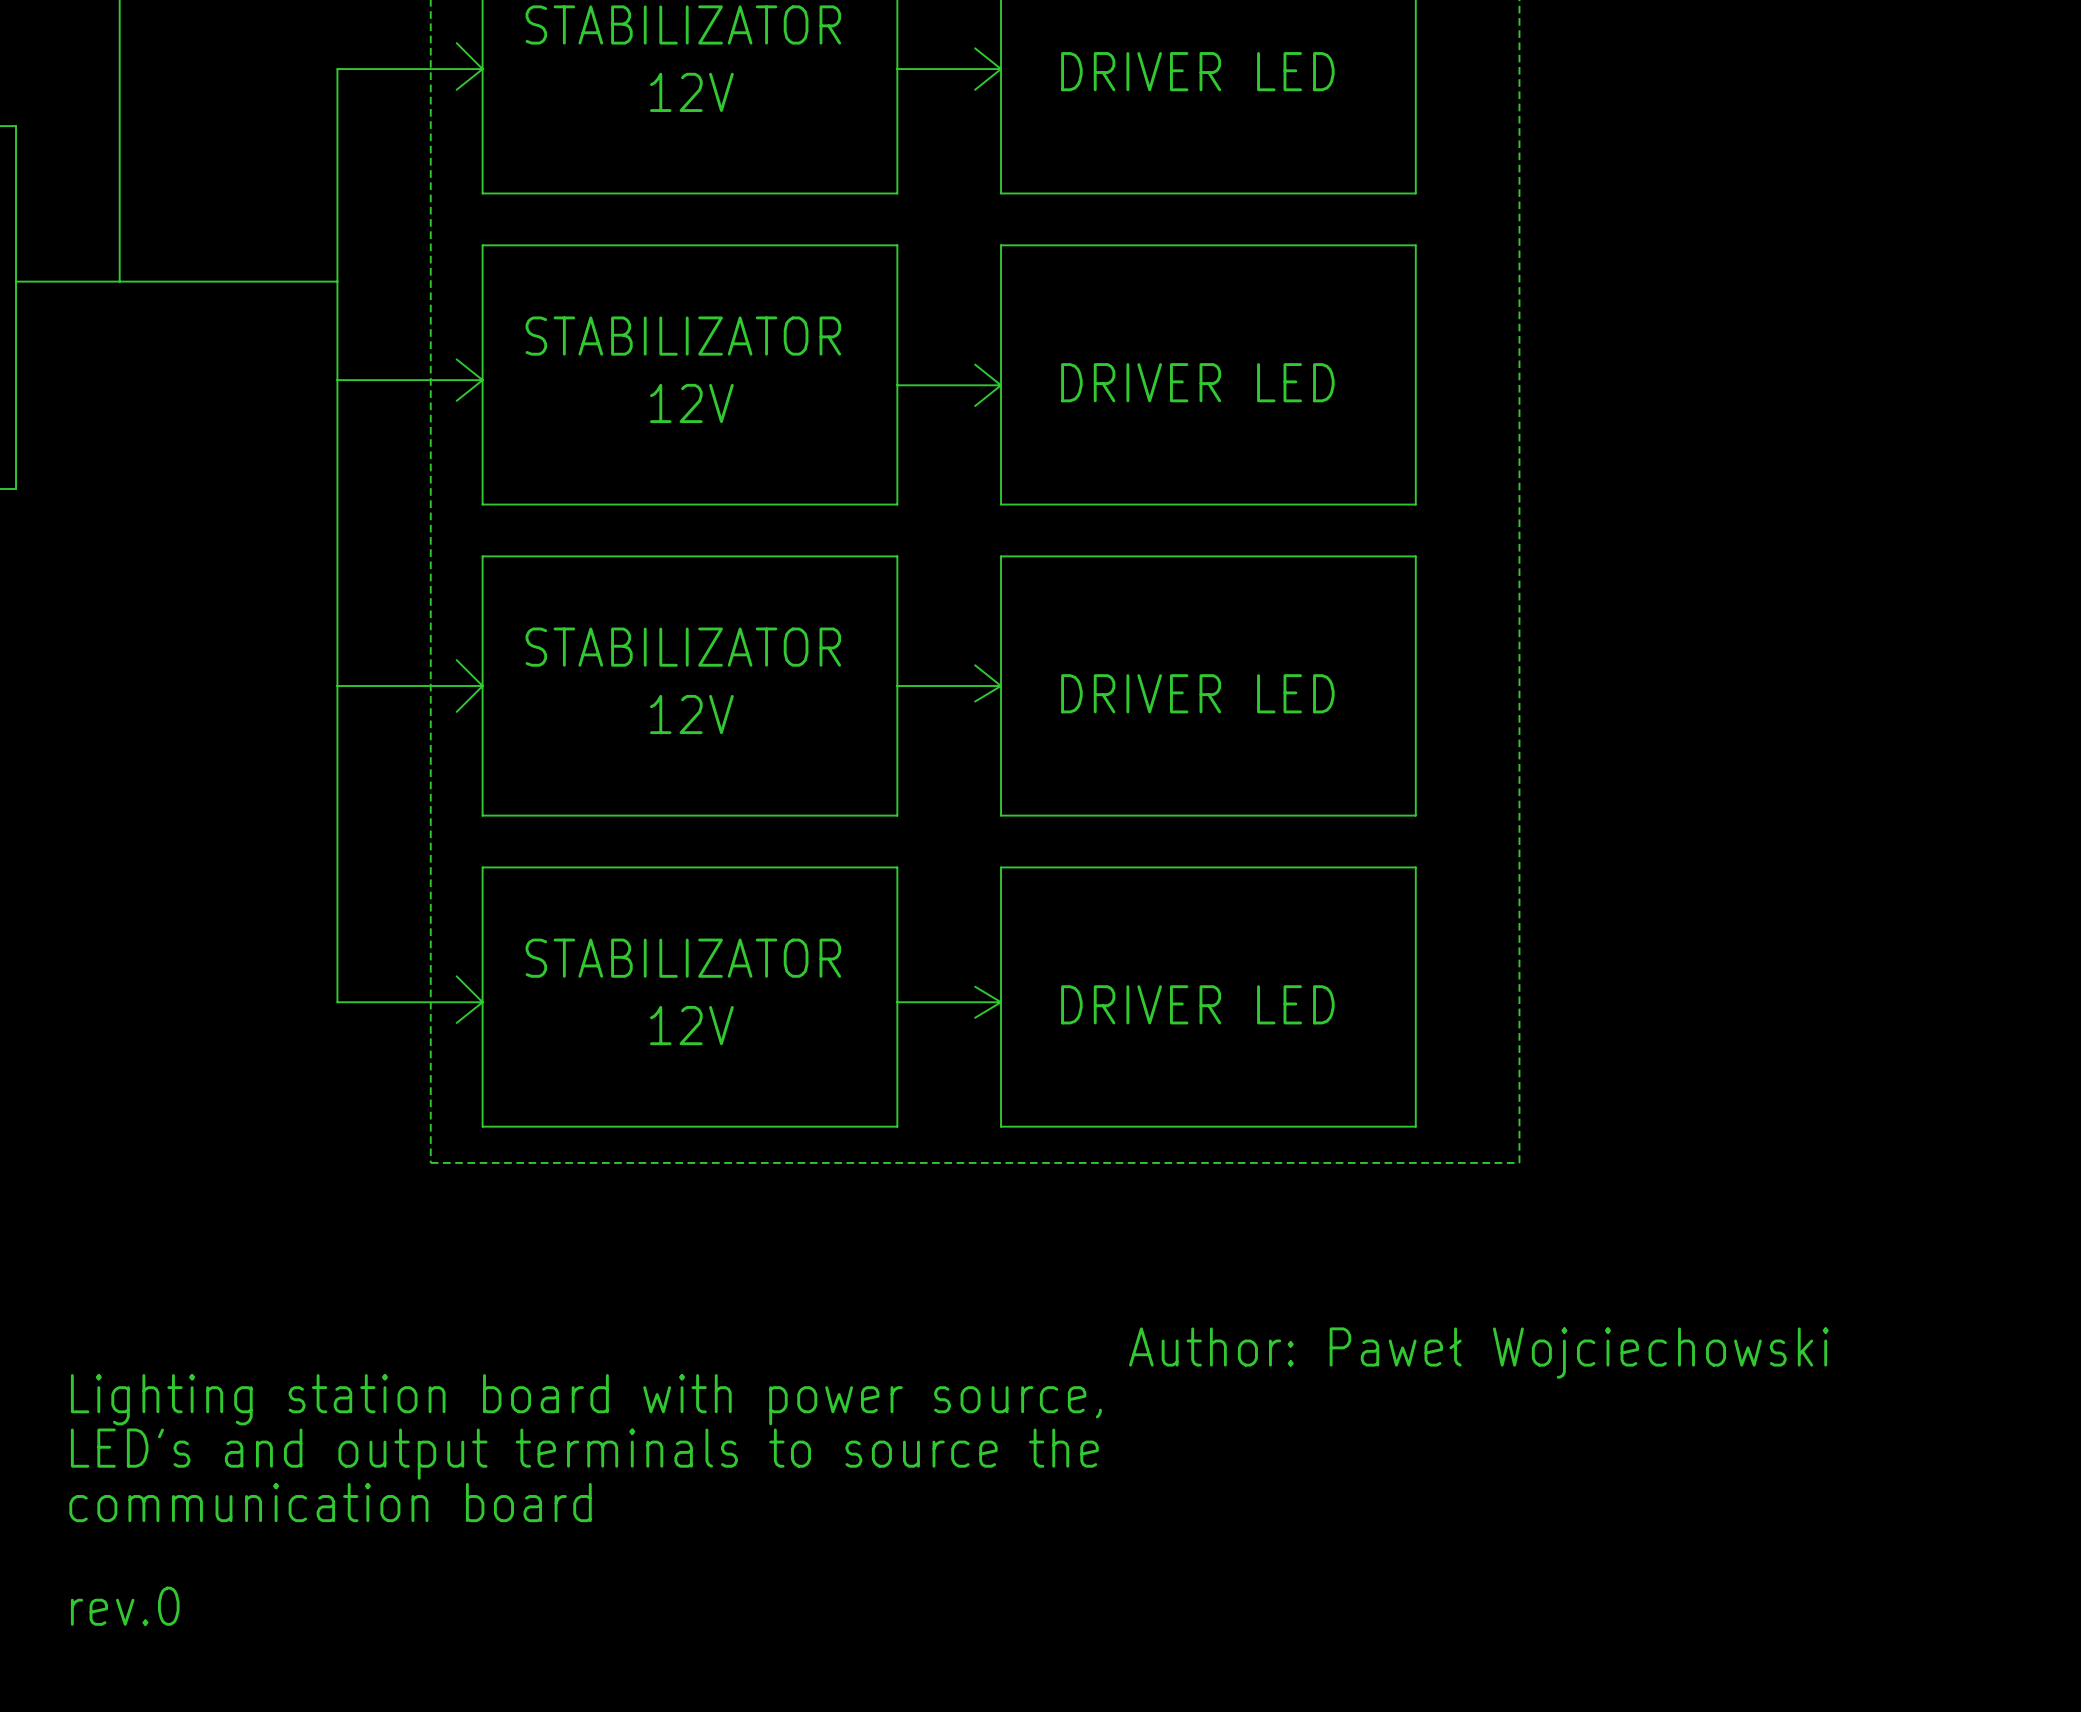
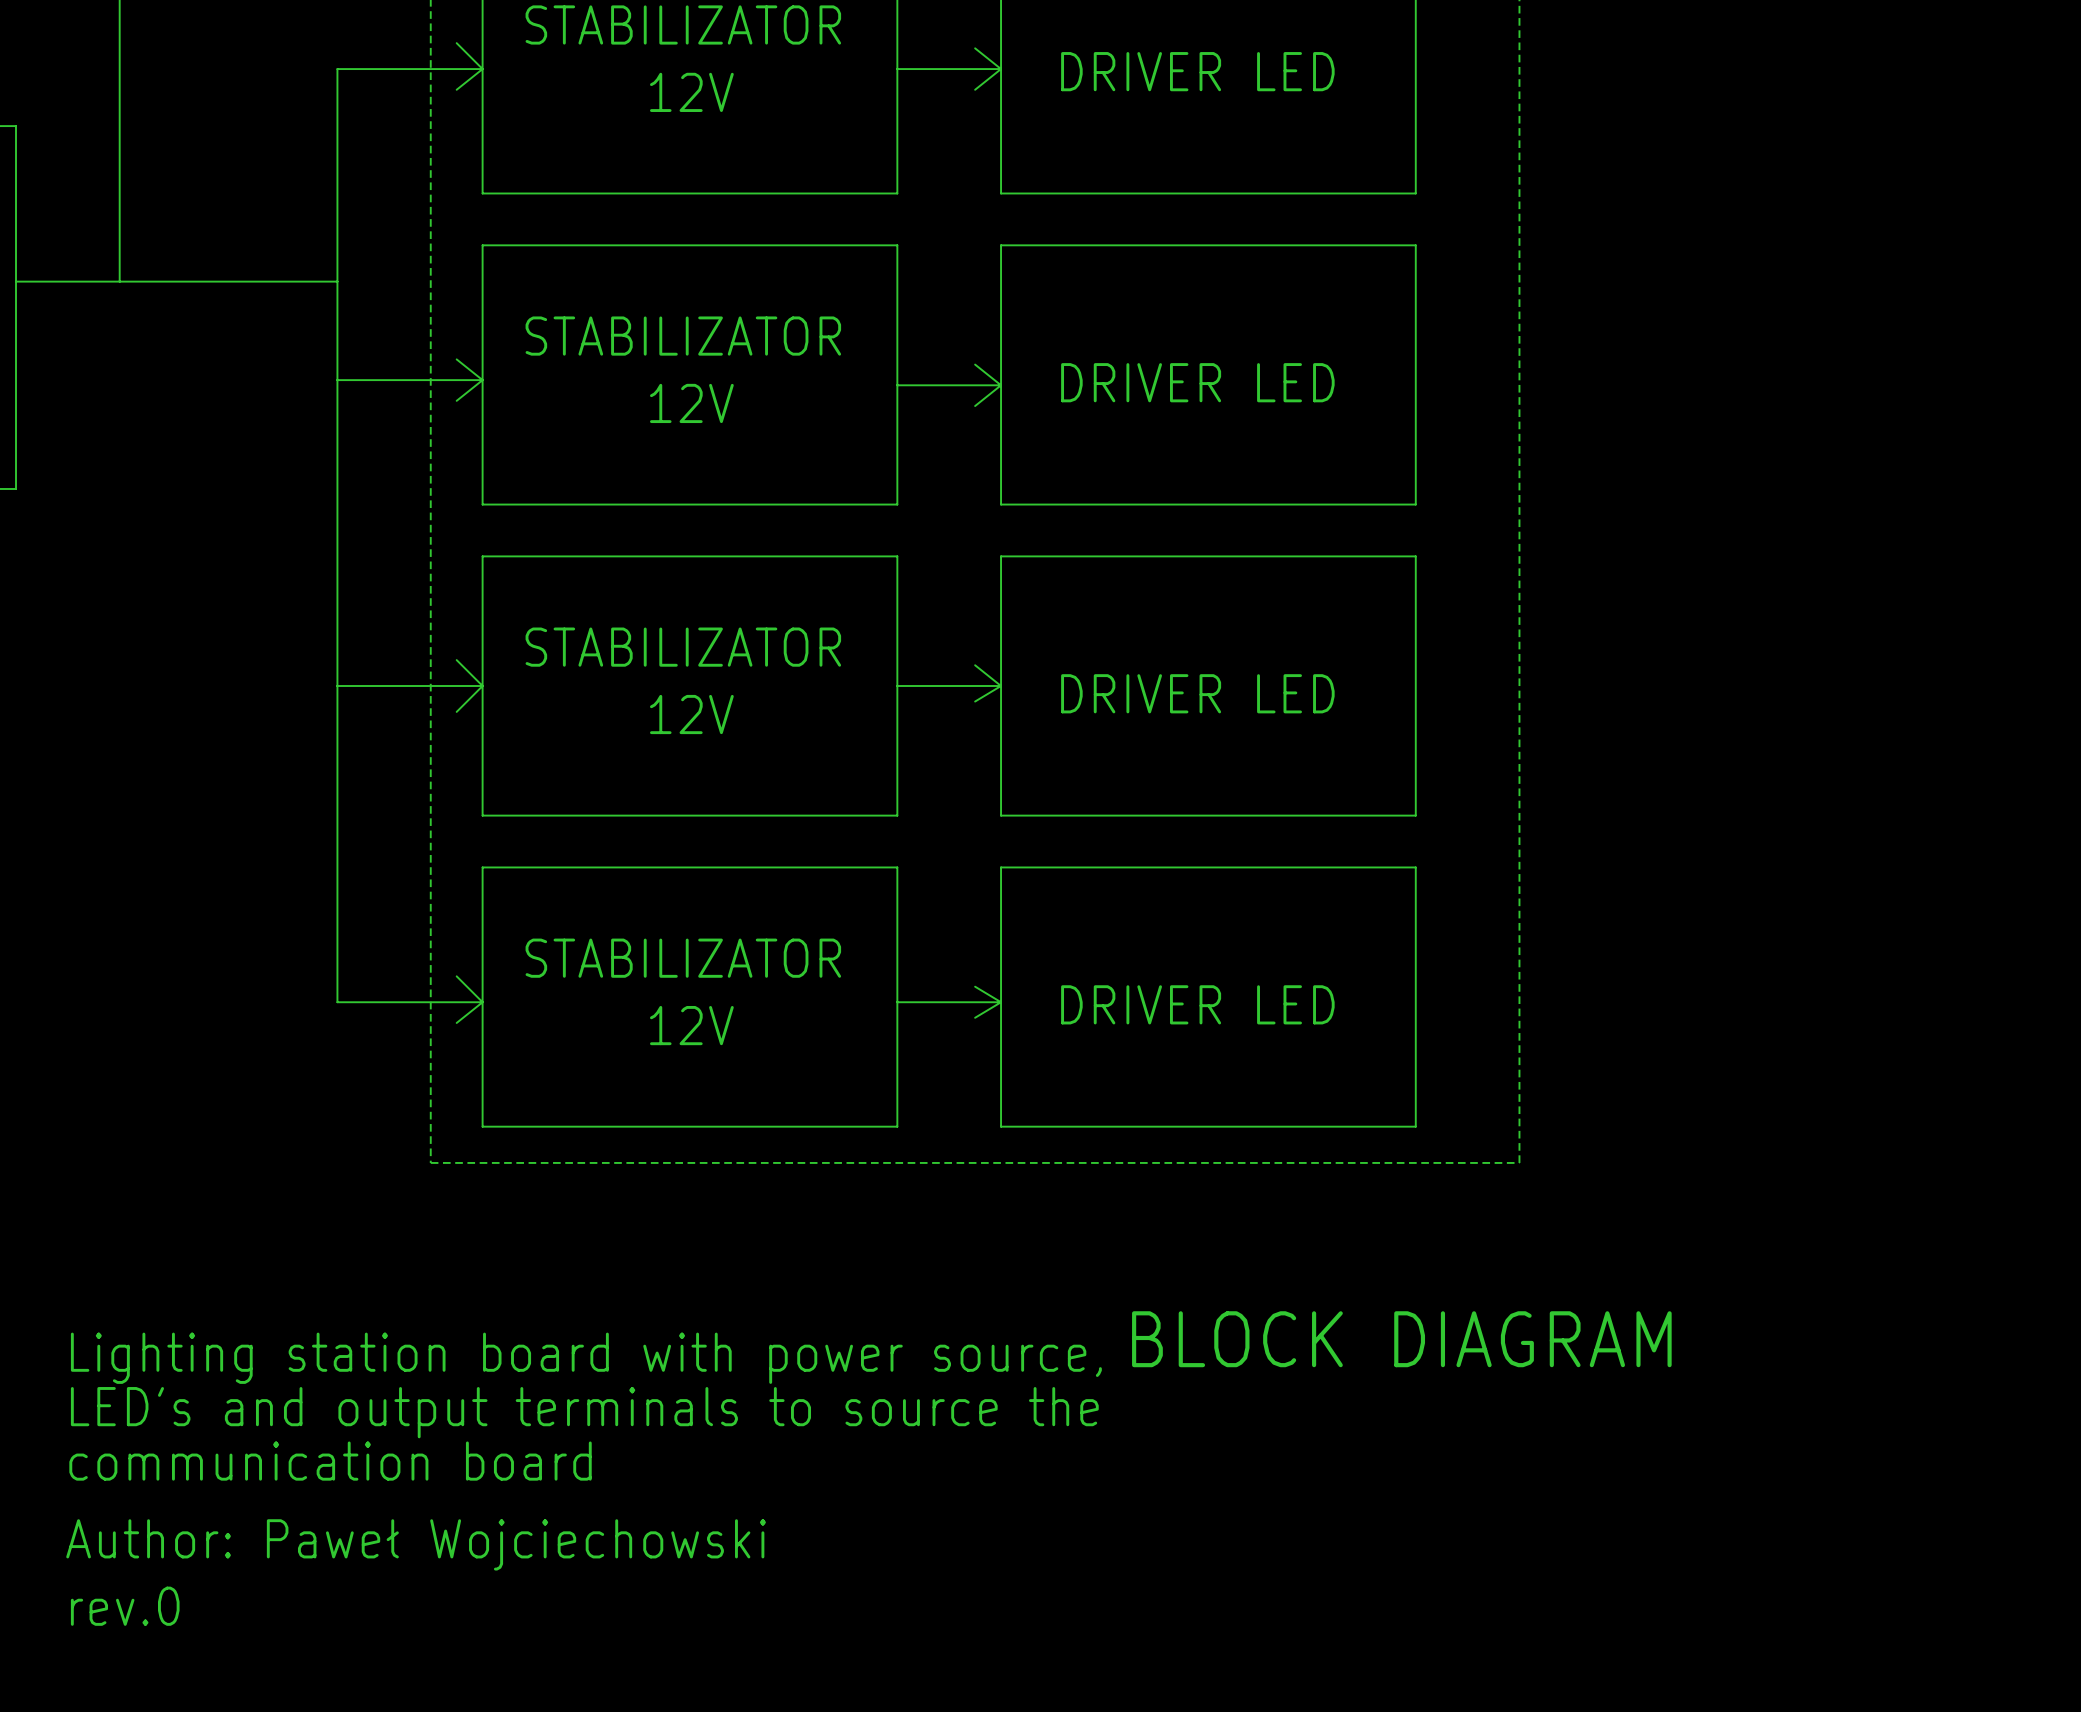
text: Author: Paweł Wojciechowski (1478, 1353) -> BLOCK DIAGRAM (1401, 1339)
text position: Lighting station board with power source, (586, 1399) -> Lighting station board with power source, (586, 1358)
text position: LED's and output terminals to source the (584, 1454) -> LED's and output terminals to source the (584, 1412)
text position: communication board (330, 1502) -> communication board (330, 1461)
text: none -> Author: Paweł Wojciechowski (416, 1544)

